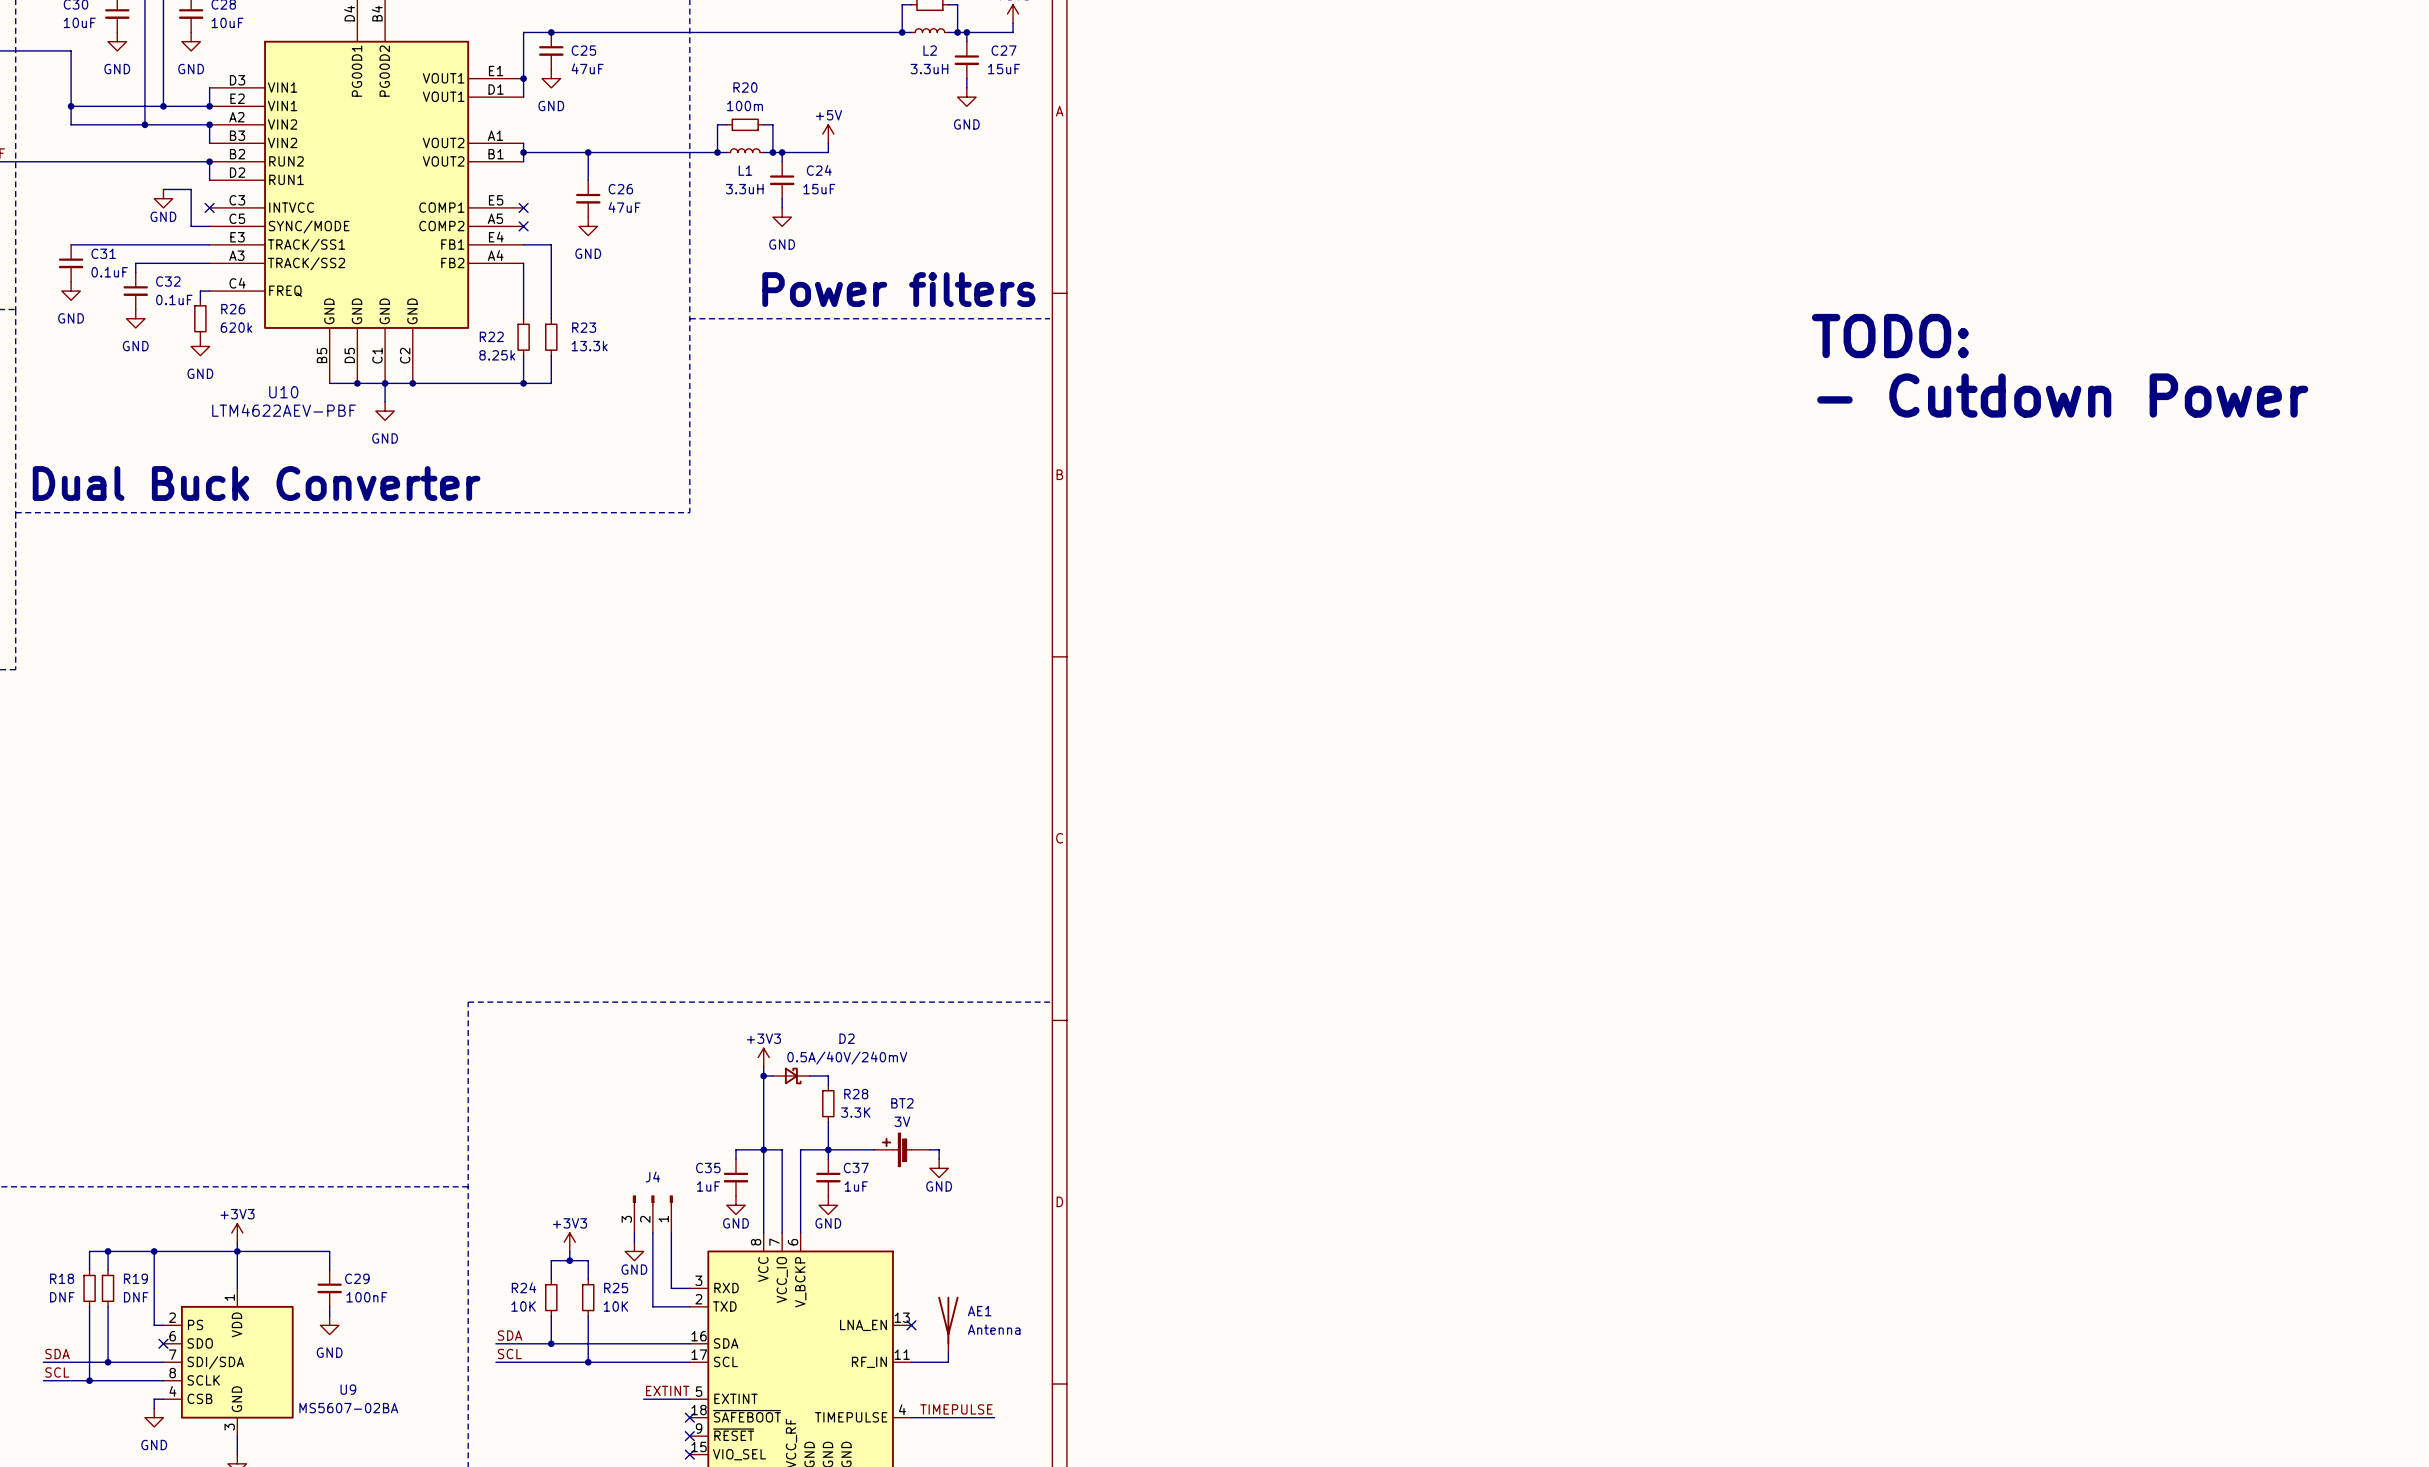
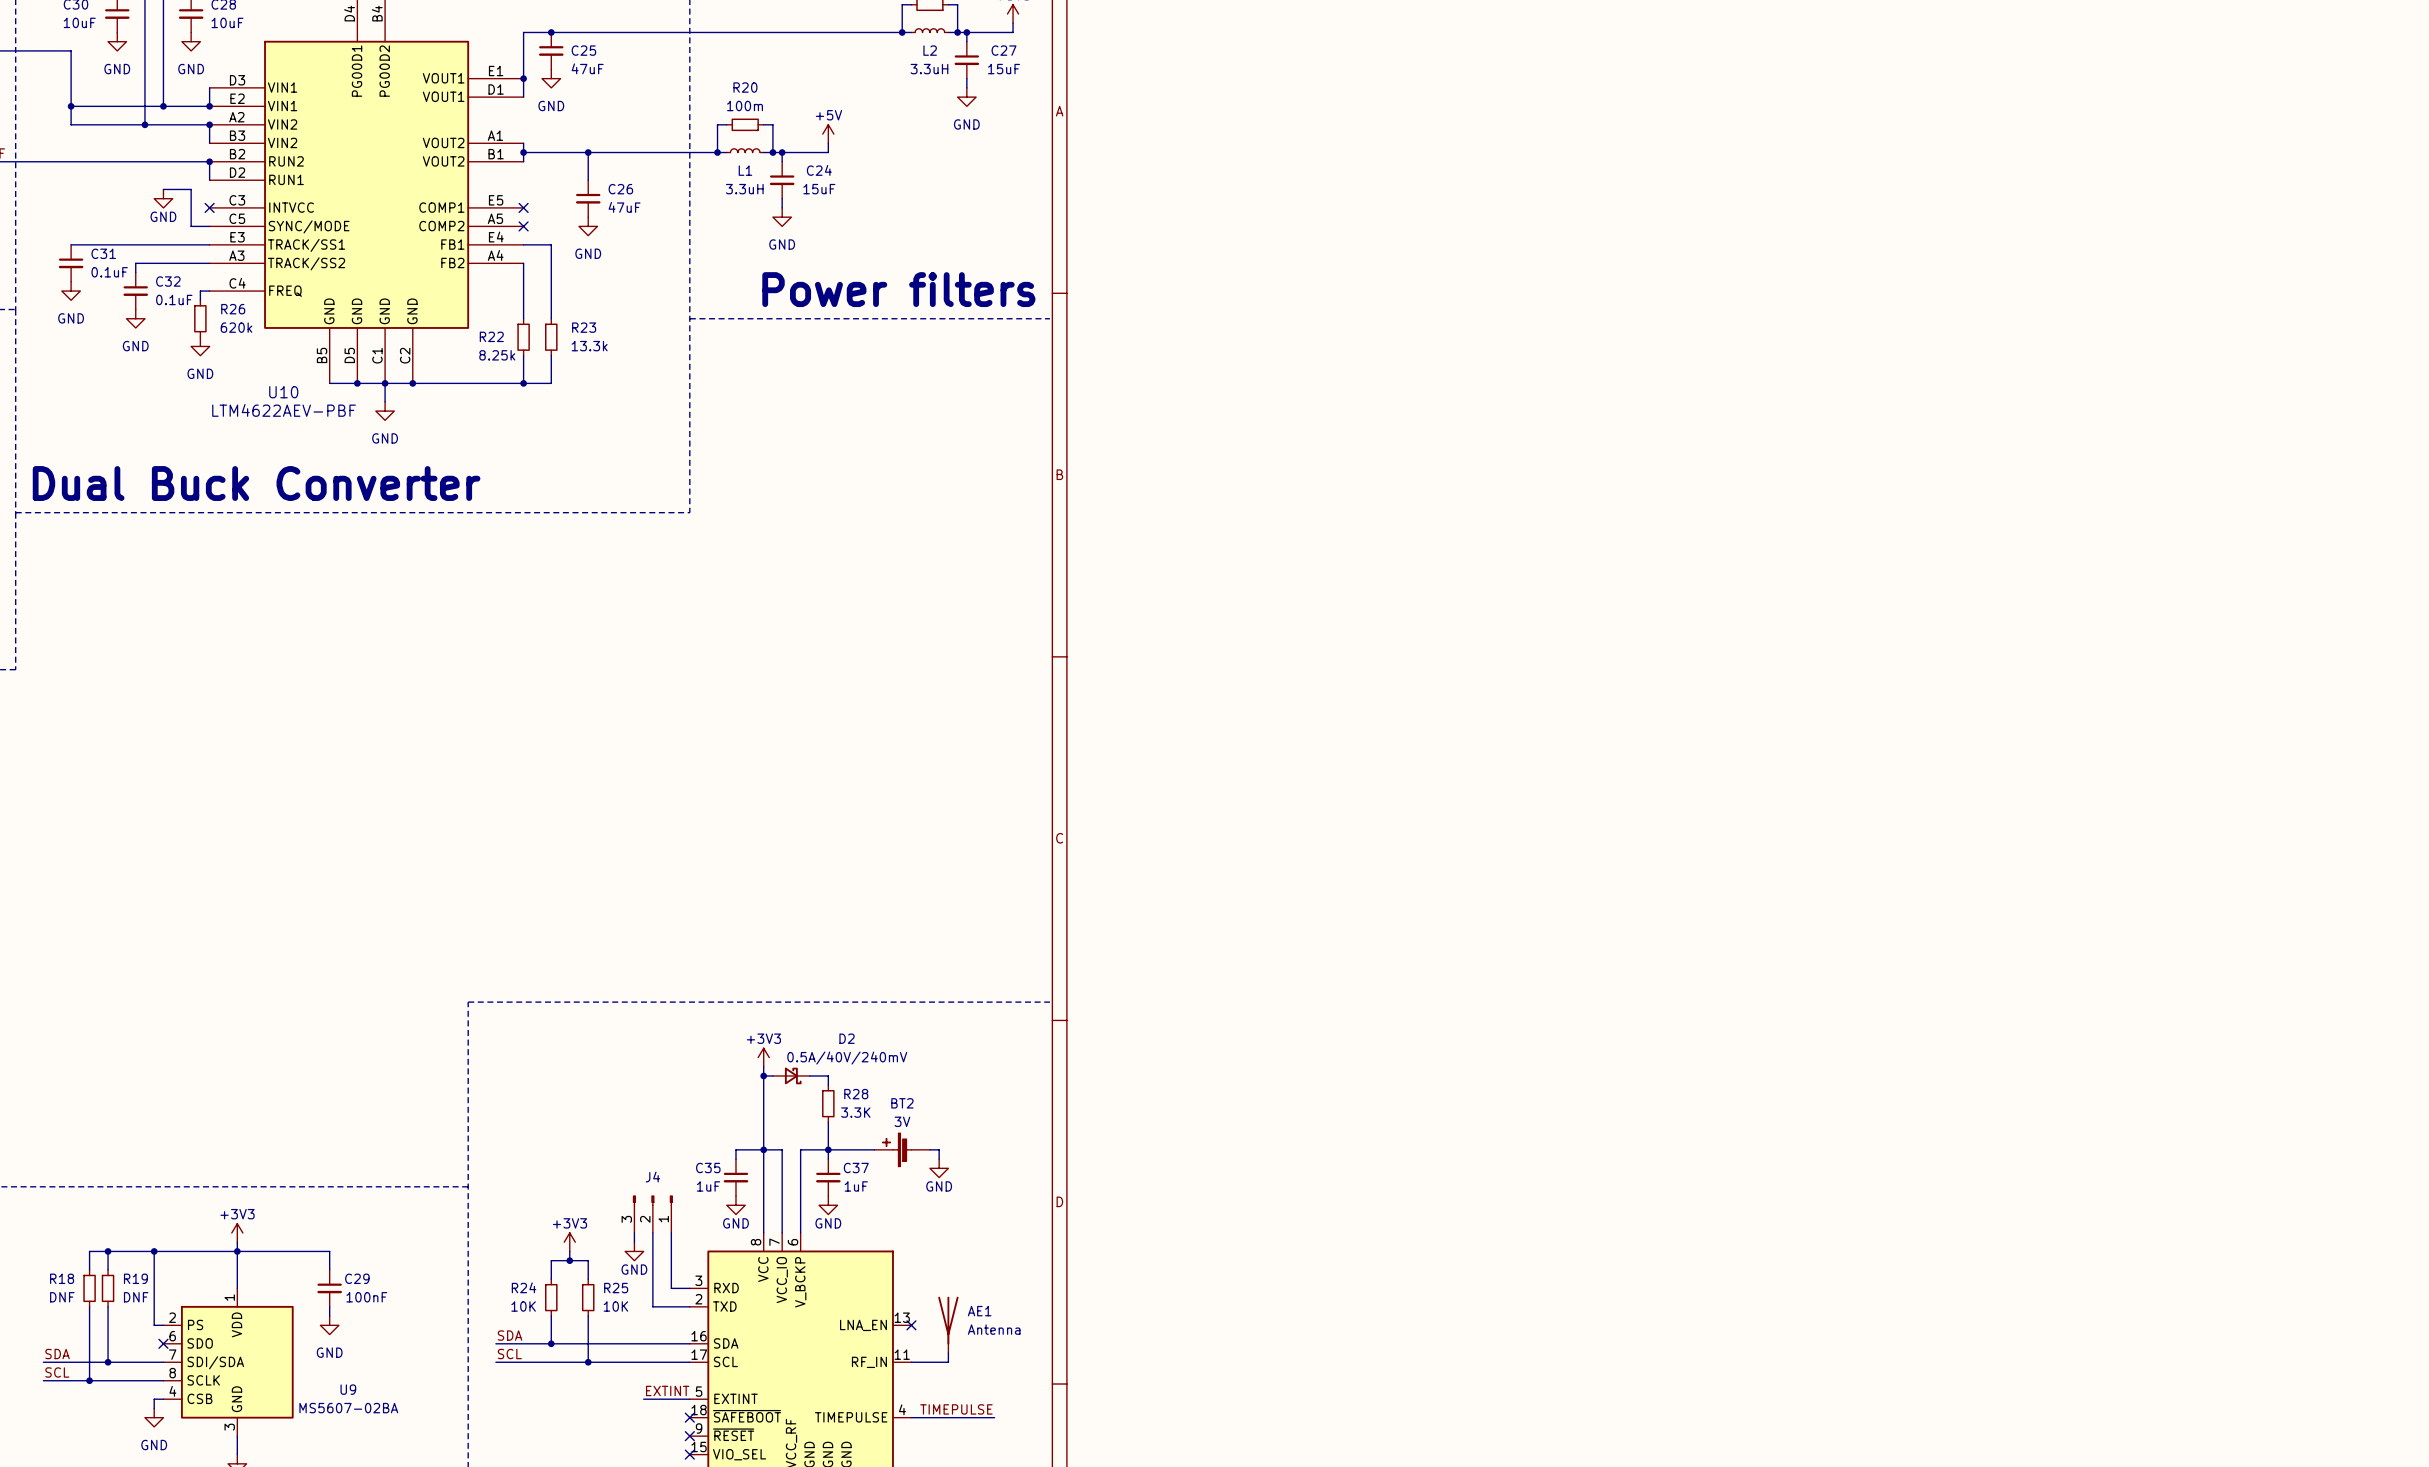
text: TODO: (1890, 336) -> none
text: - Cutdown Power (2062, 395) -> none

